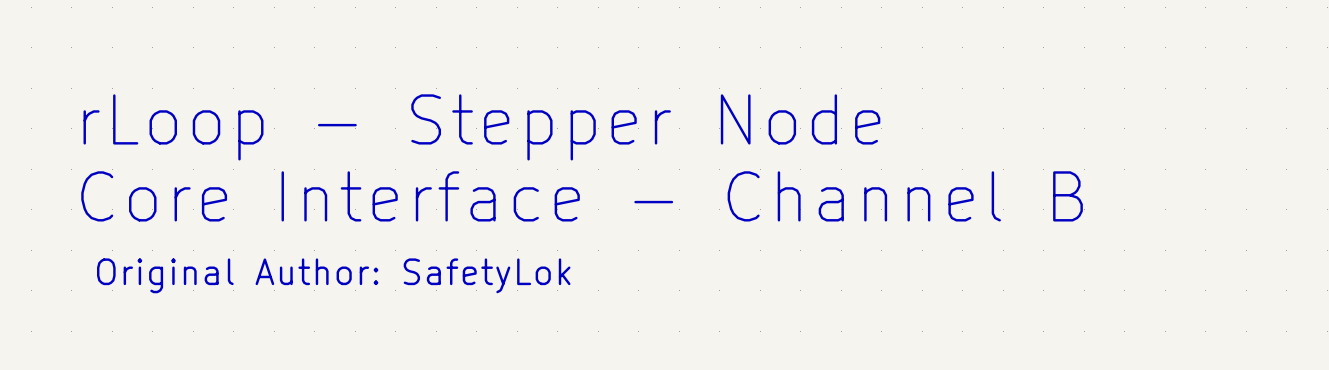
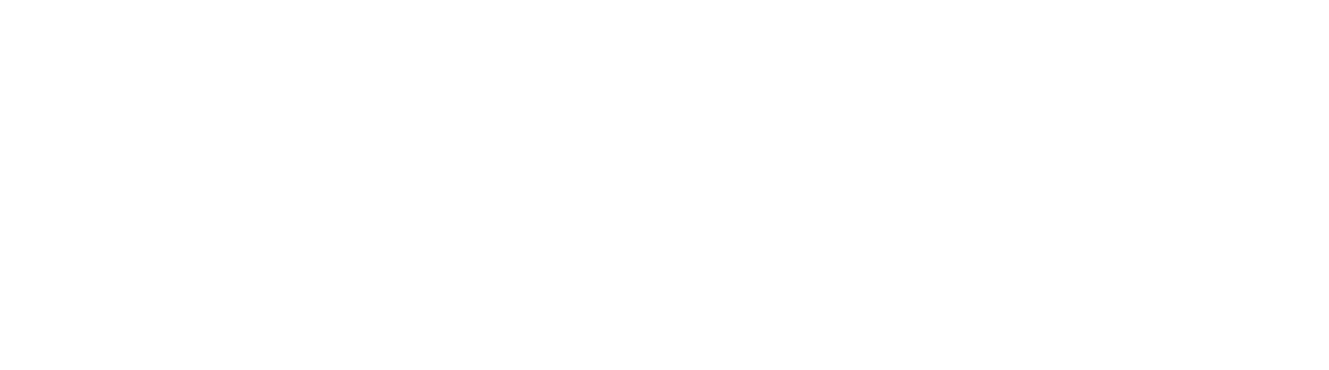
text: rLoop - Stepper Node (481, 127) -> none
text: Core Interface - Channel B (582, 196) -> none
text: Original Author: SafetyLok (333, 275) -> none

